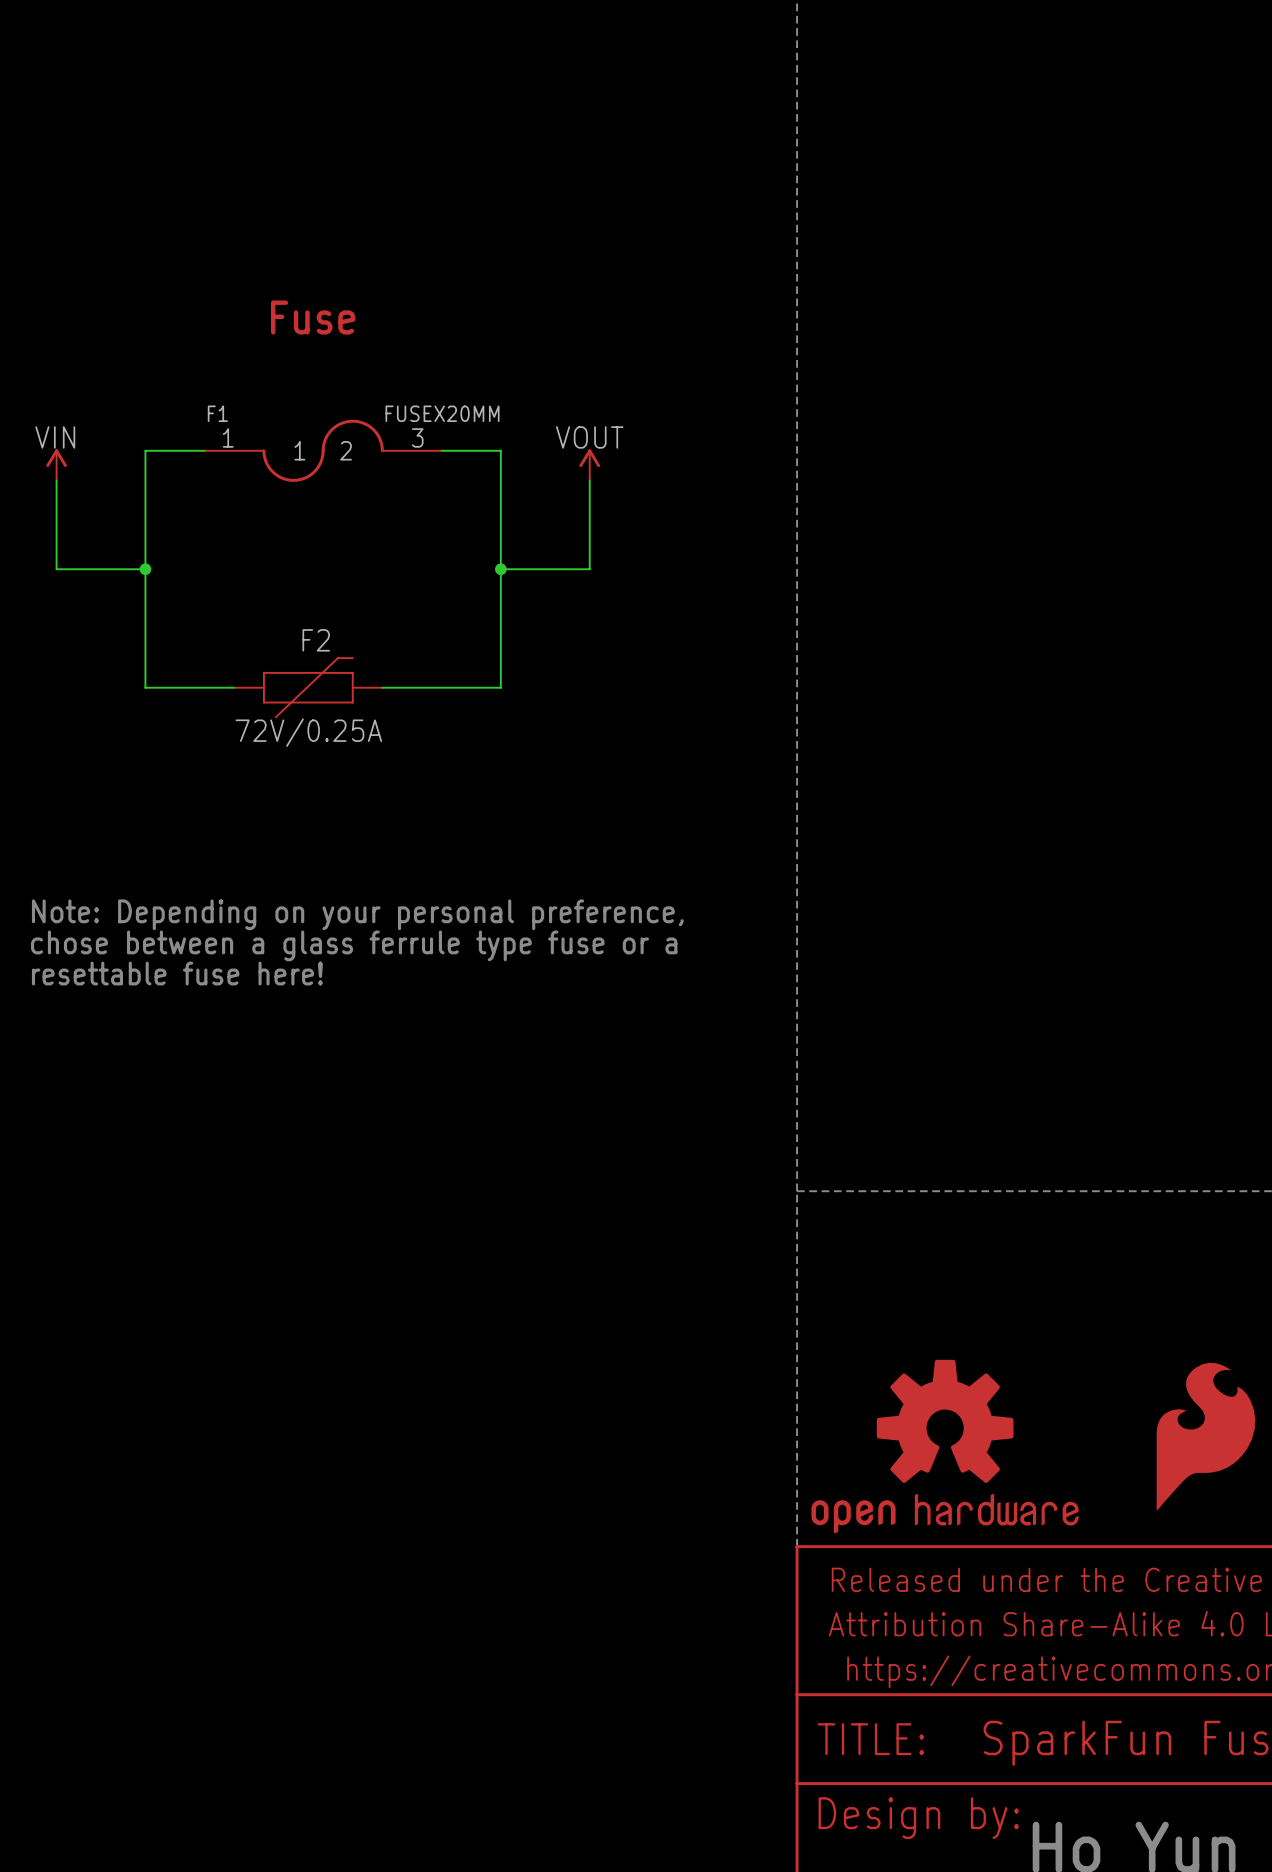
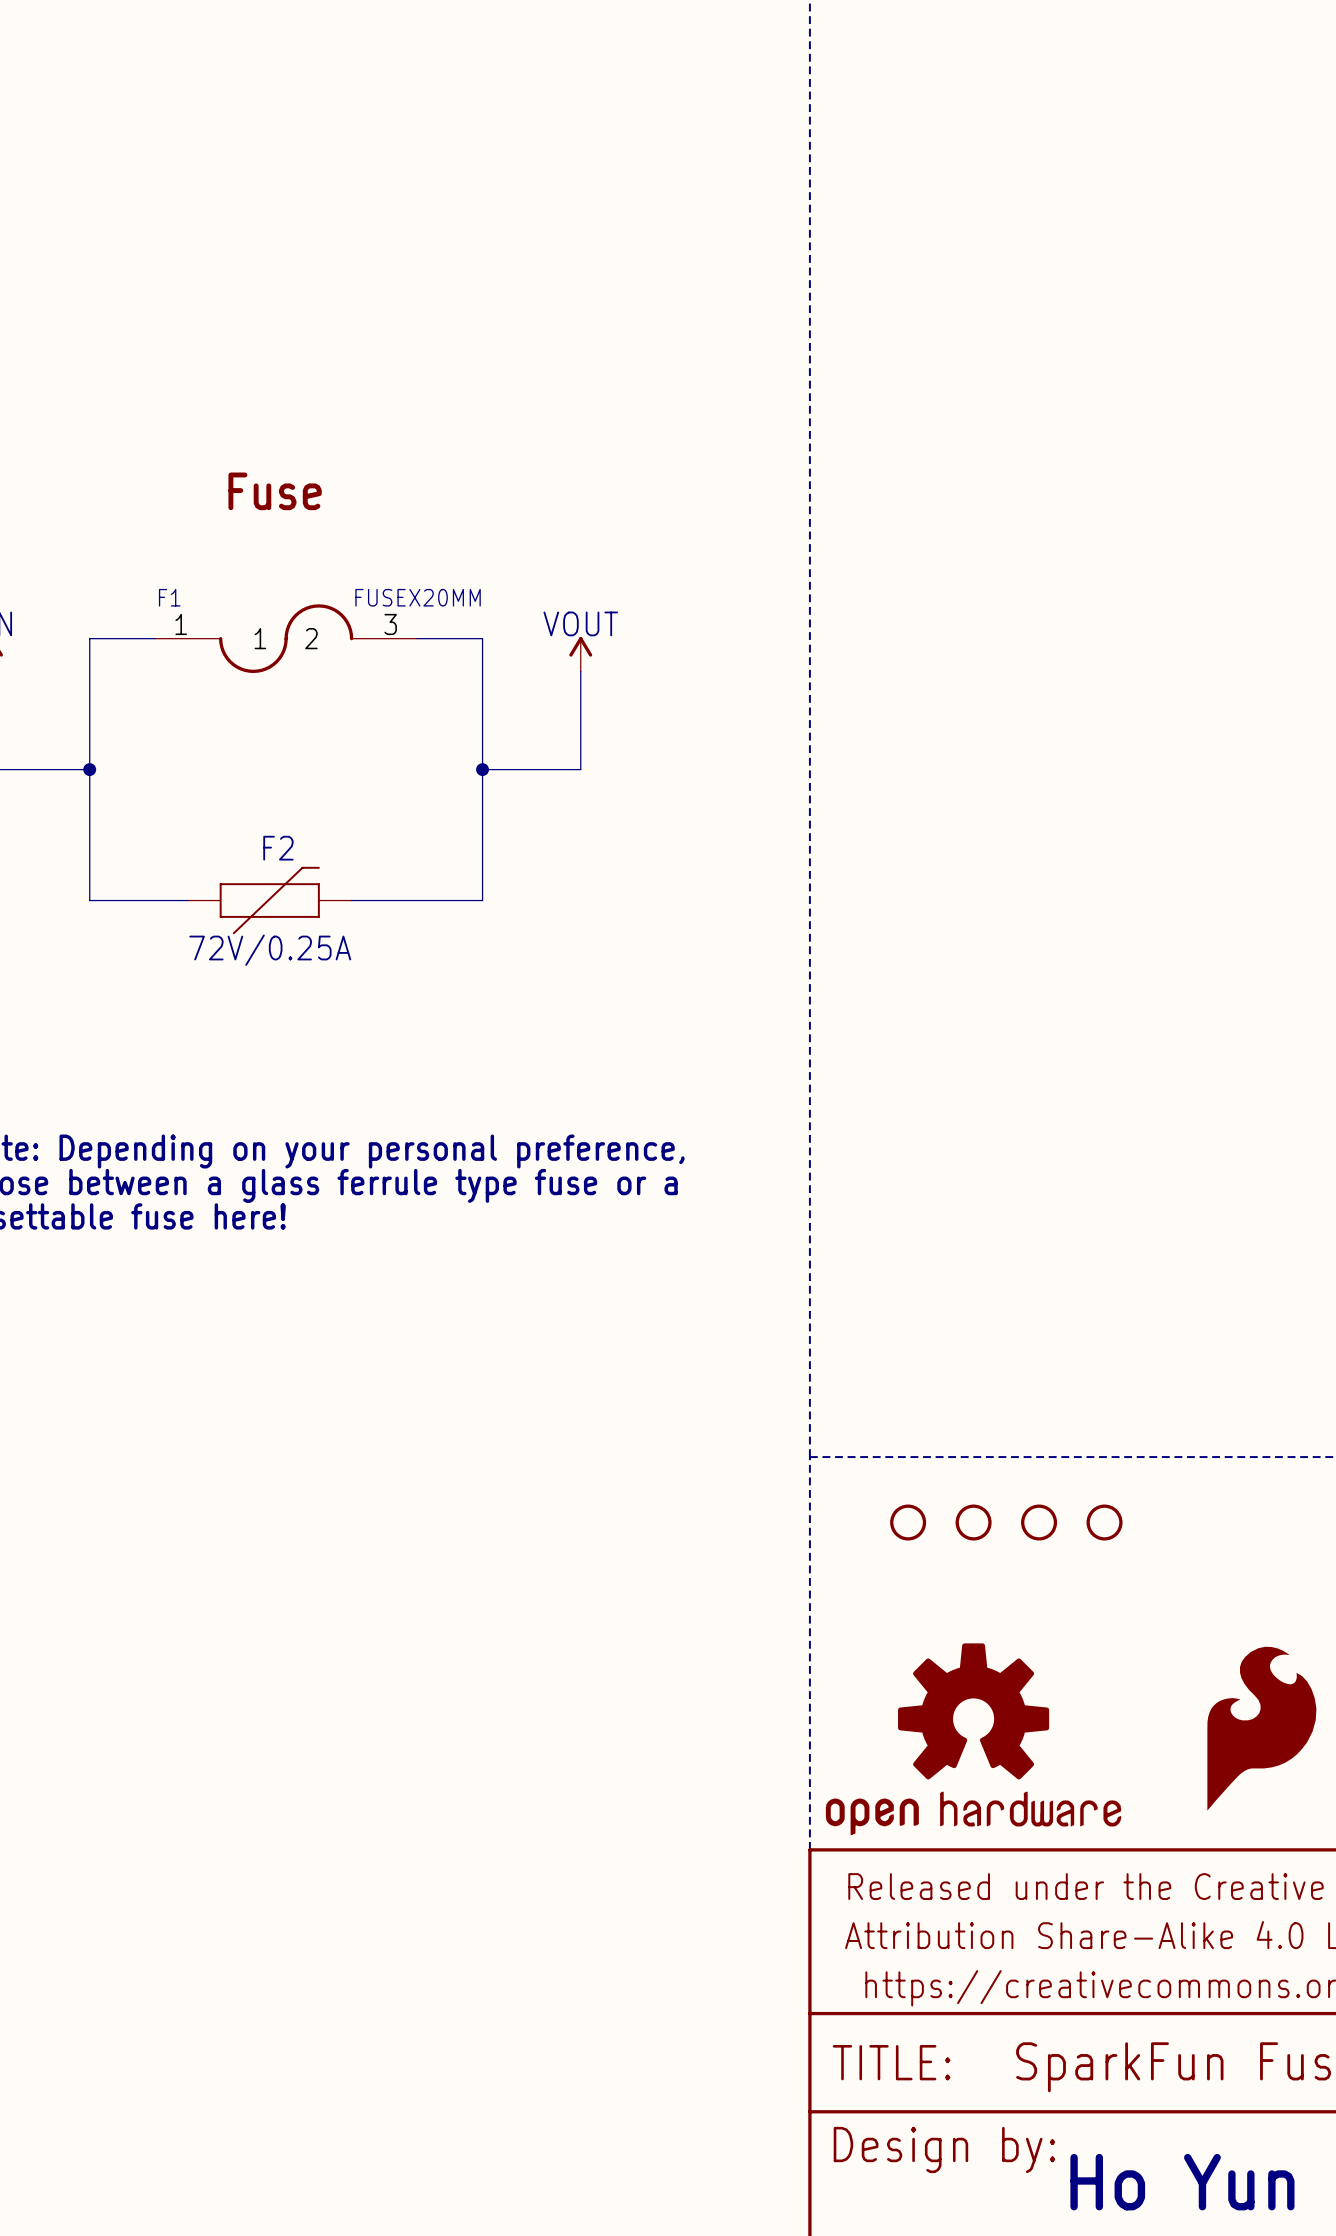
part: none -> (908, 1522)
part: none -> (973, 1522)
part: none -> (1039, 1522)
part: none -> (1104, 1522)

